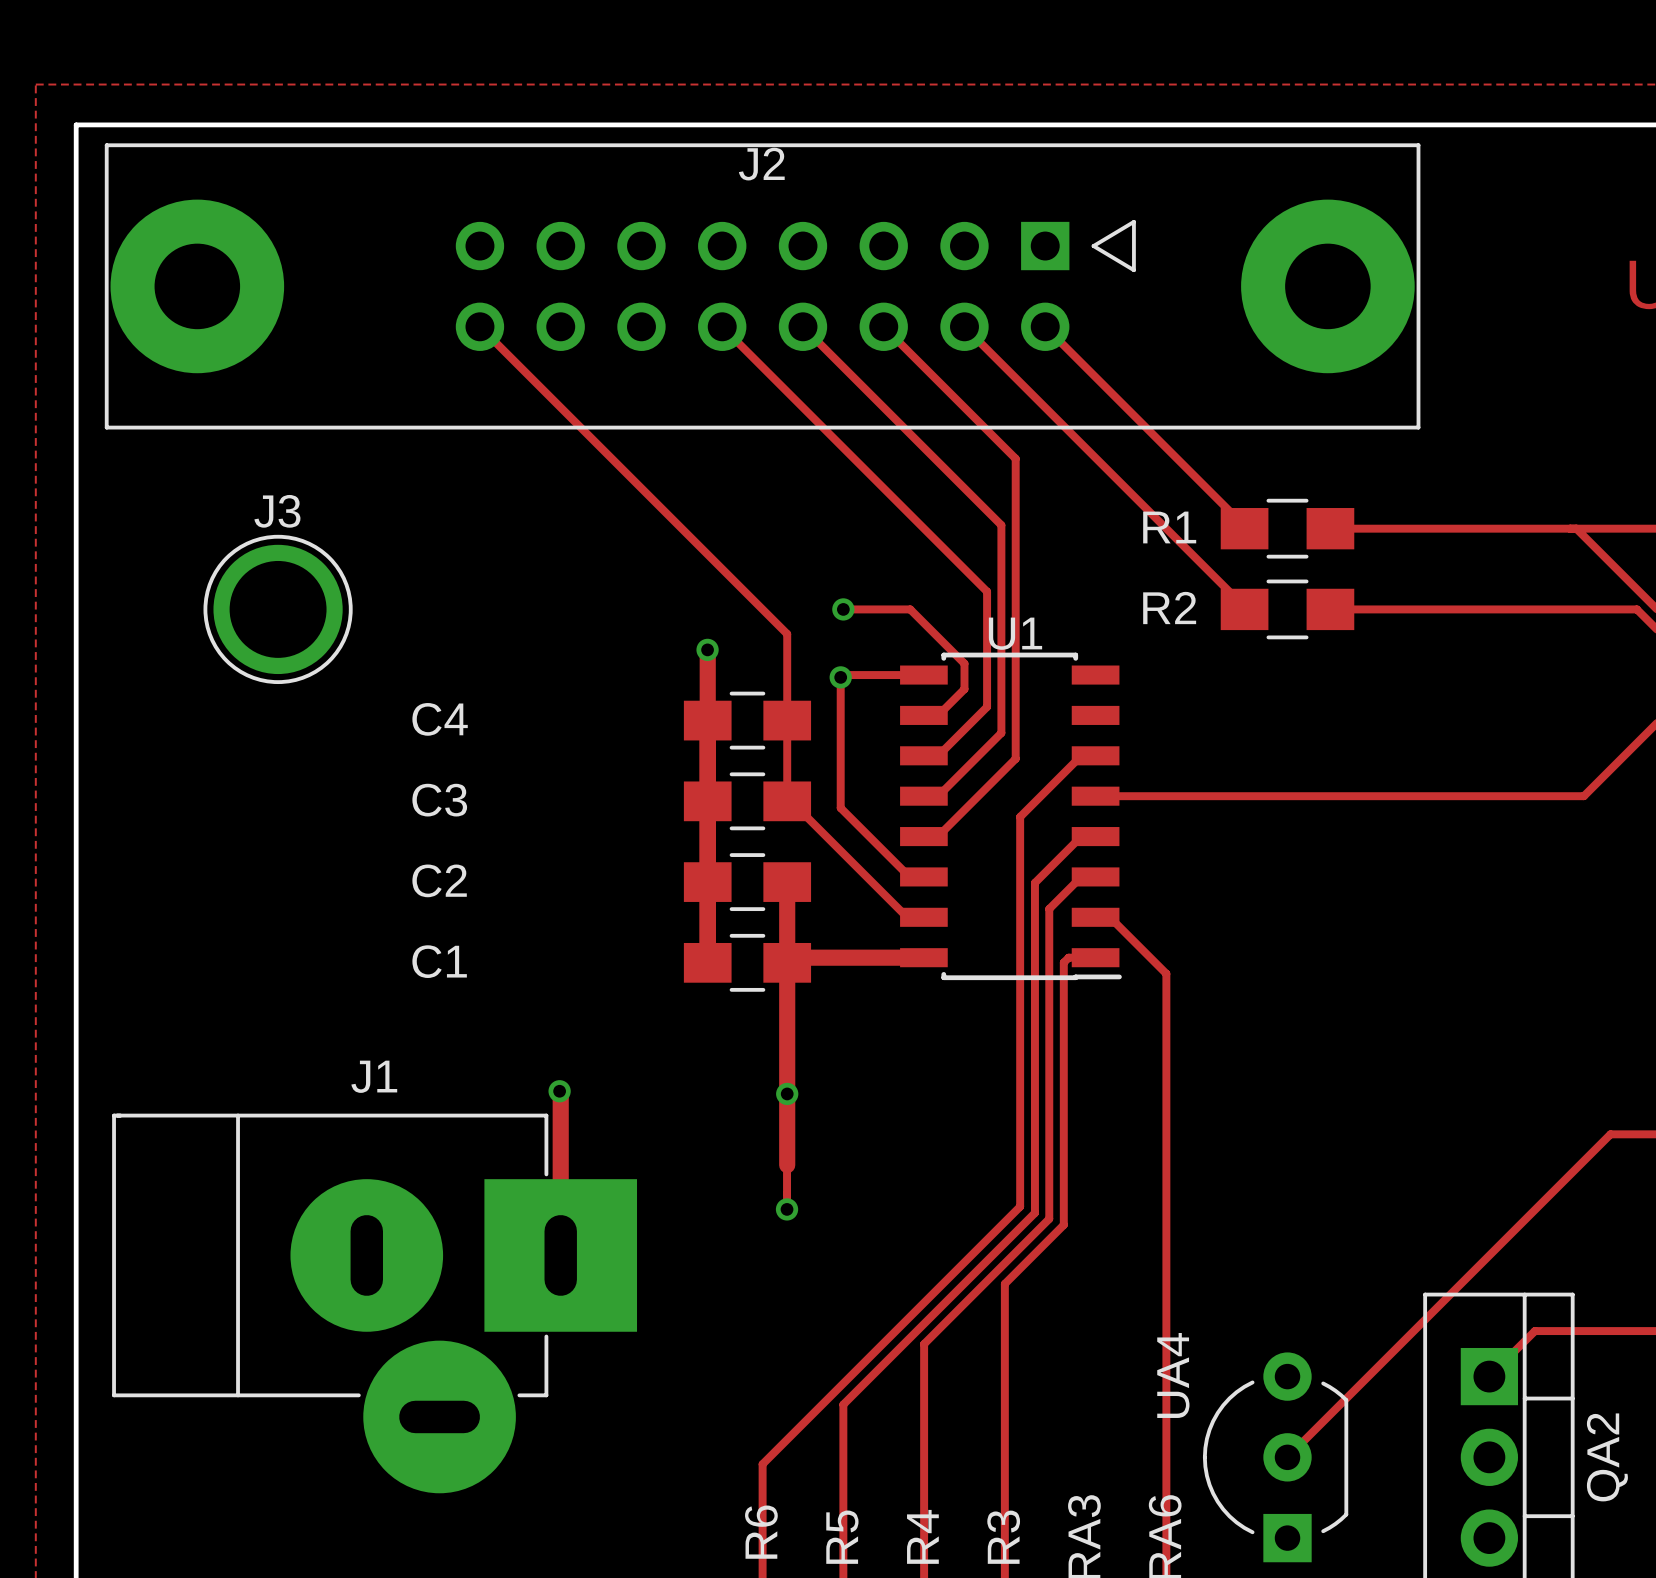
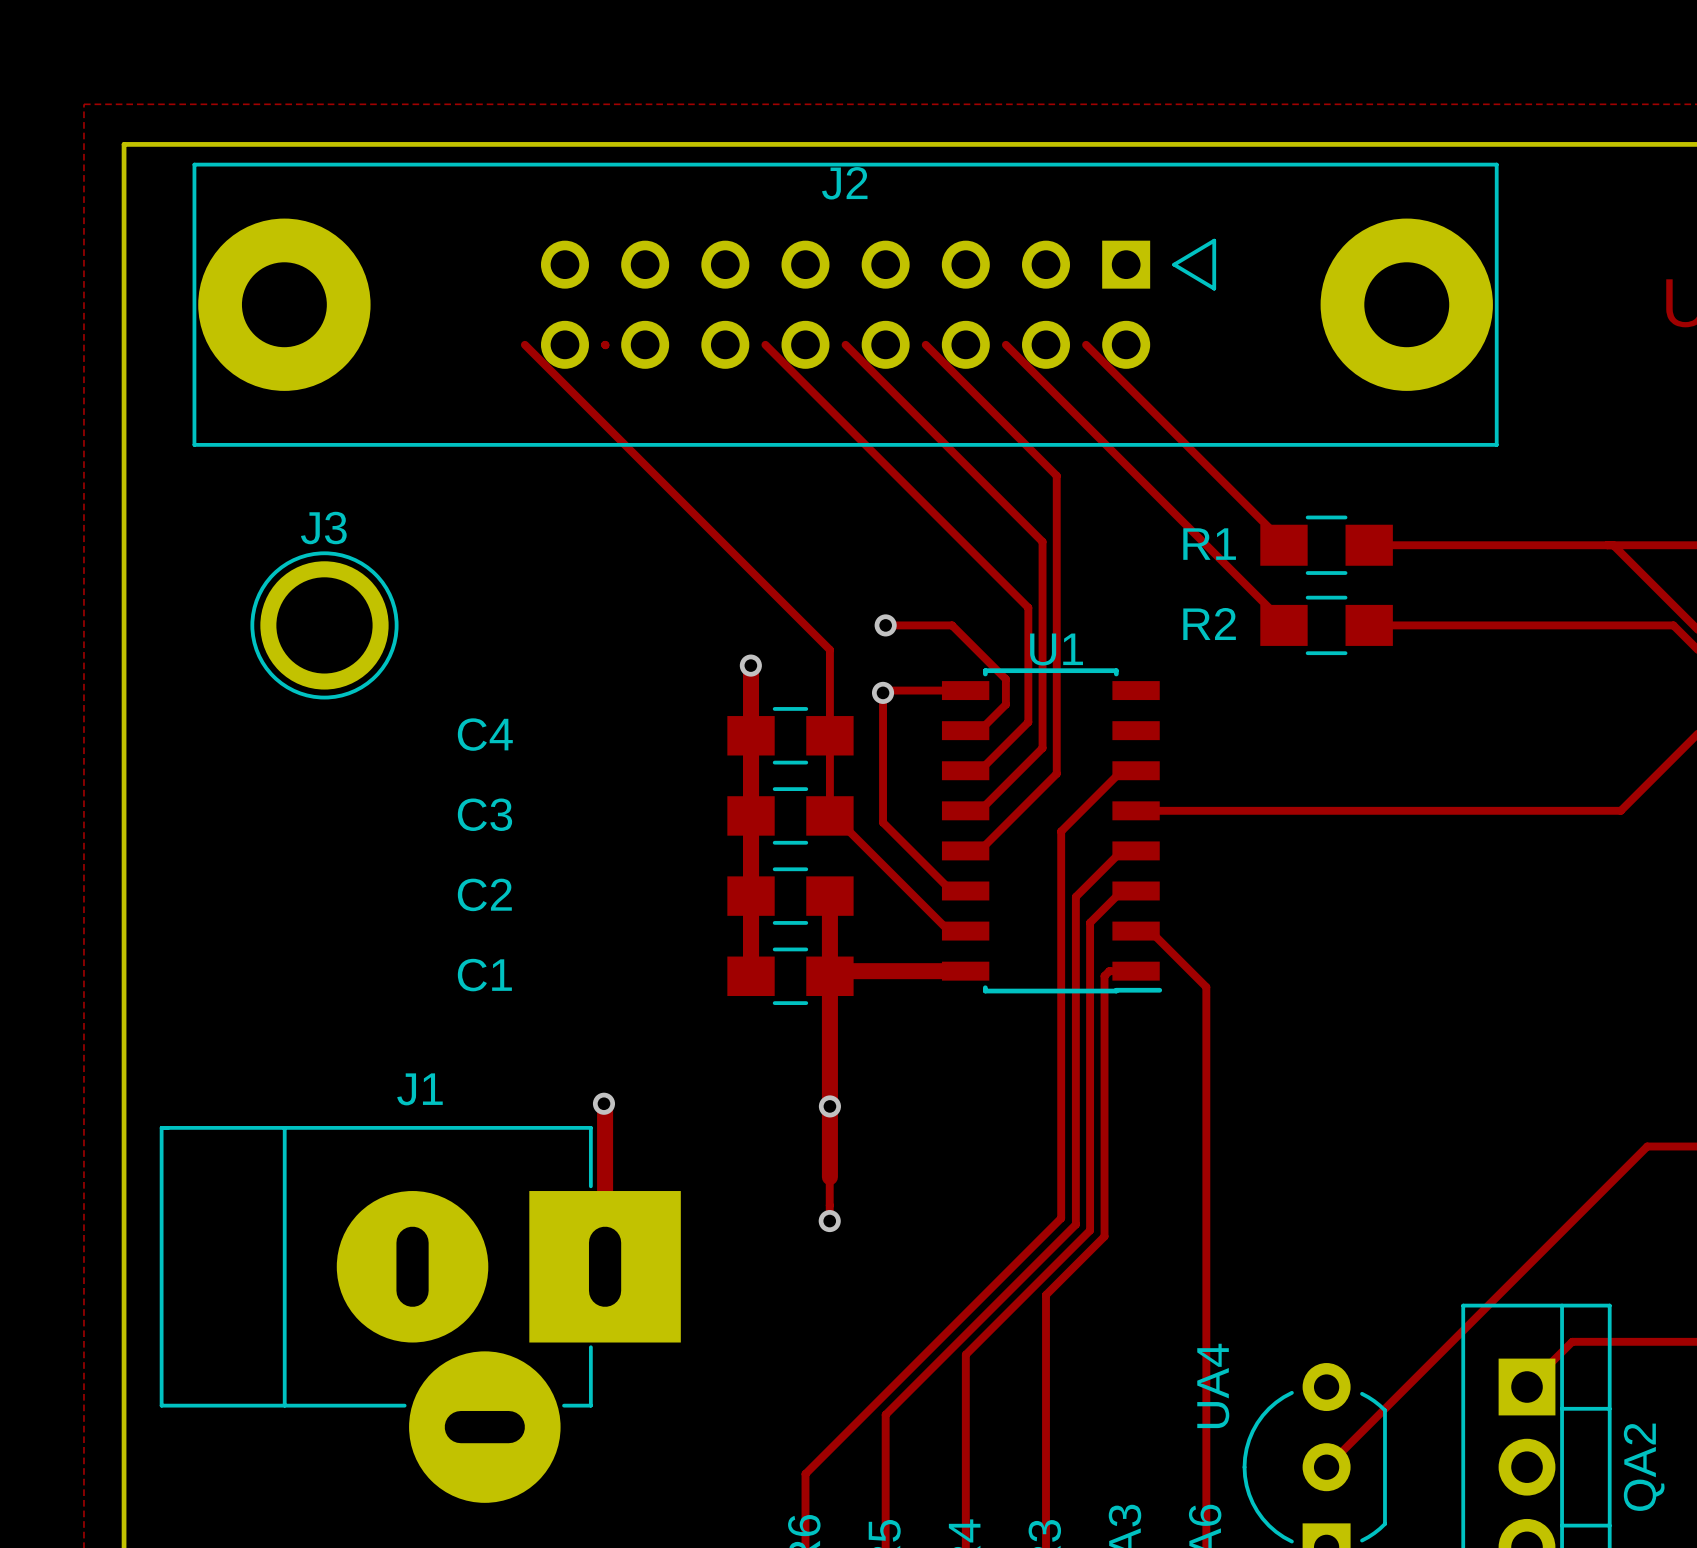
J2 position: (762, 286) -> (845, 304)

